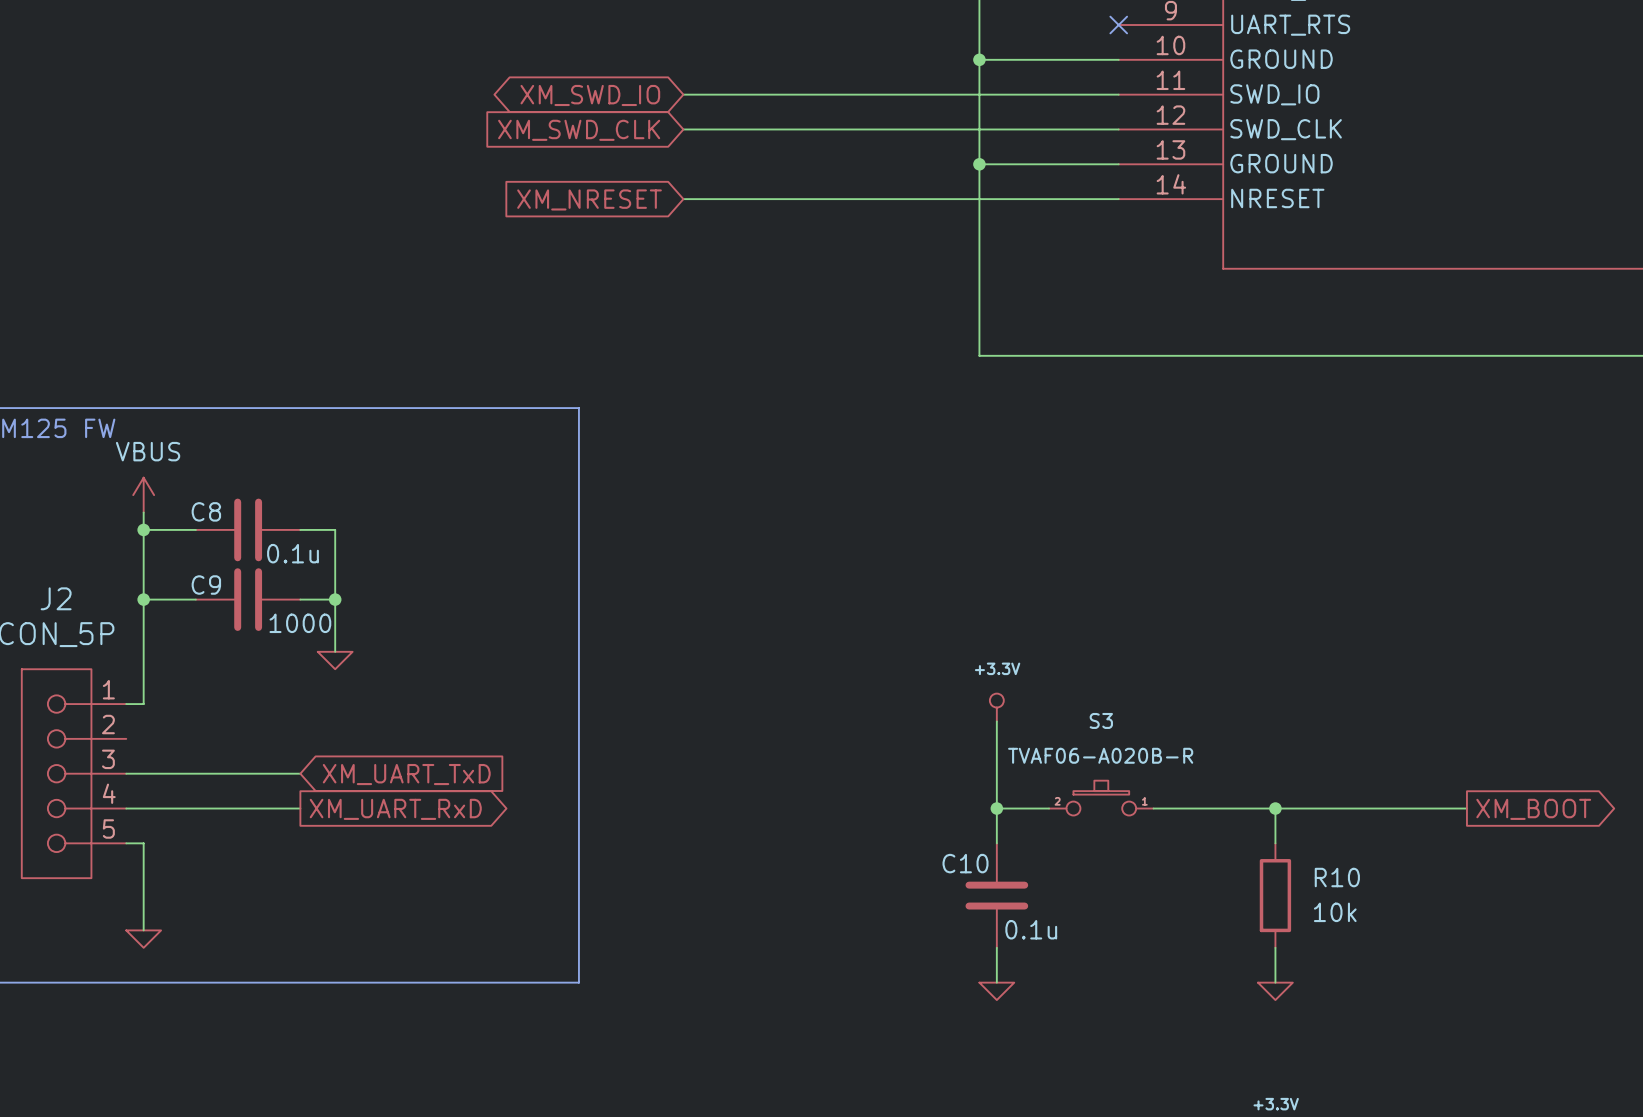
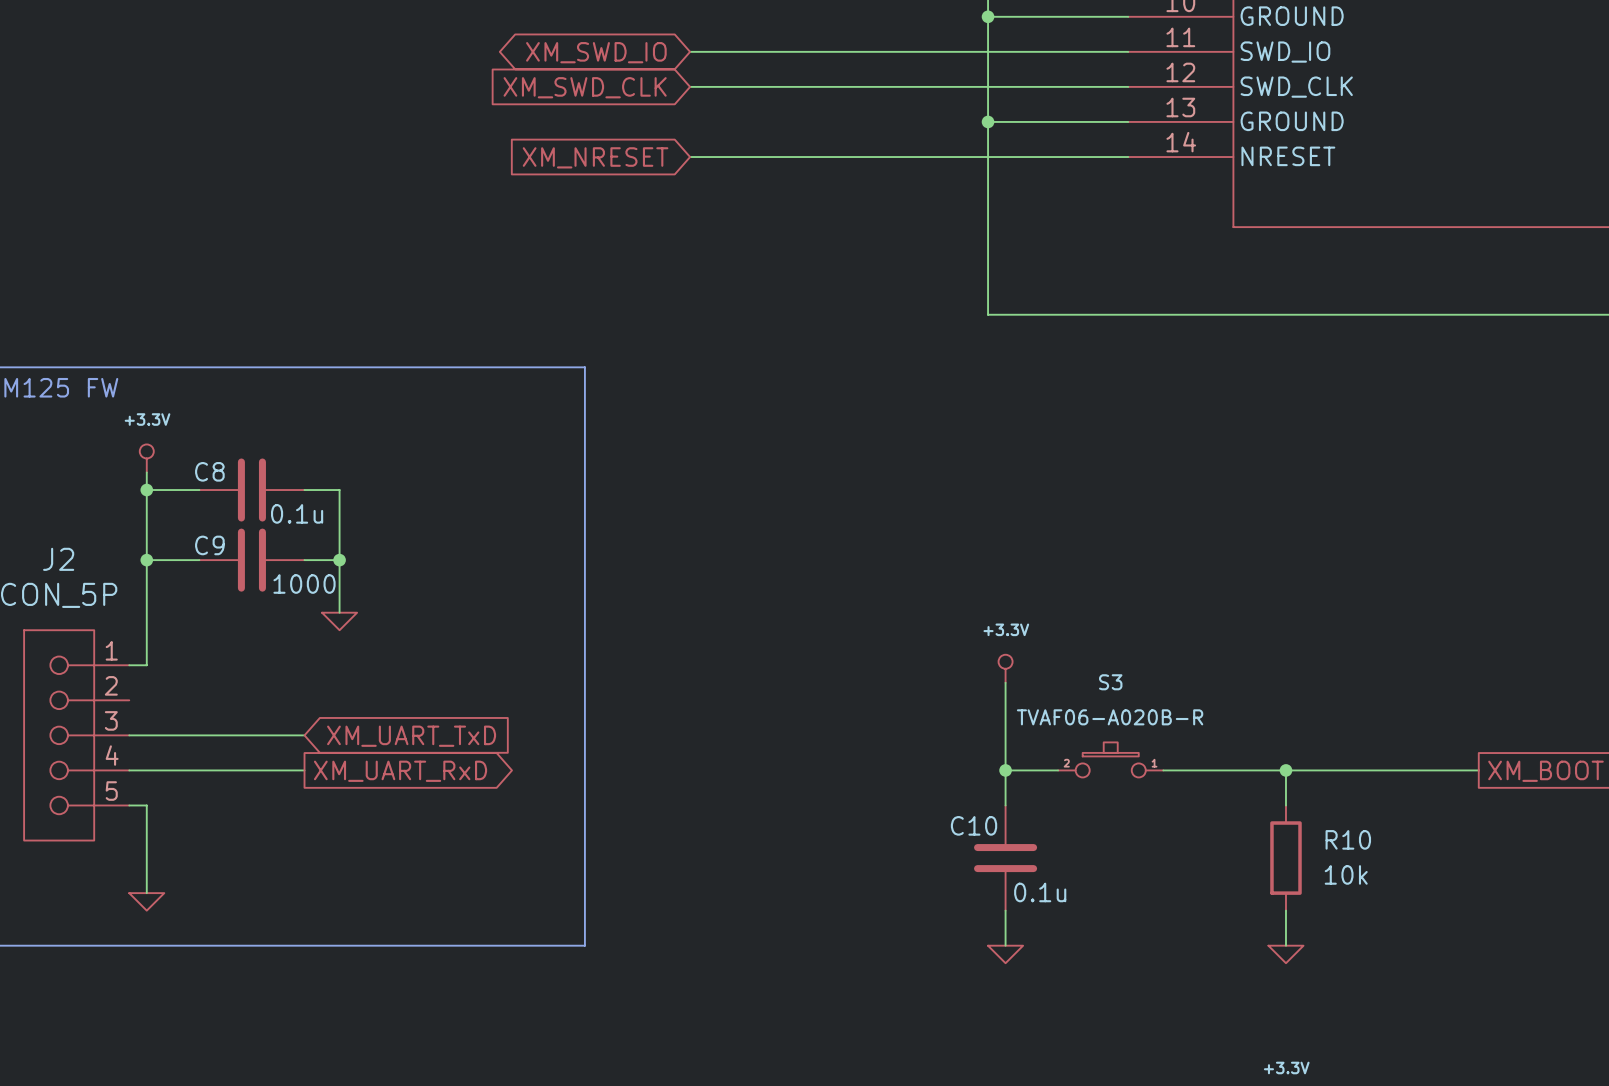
power symbol: VBUS (143, 495) -> +3.3V (146, 458)

